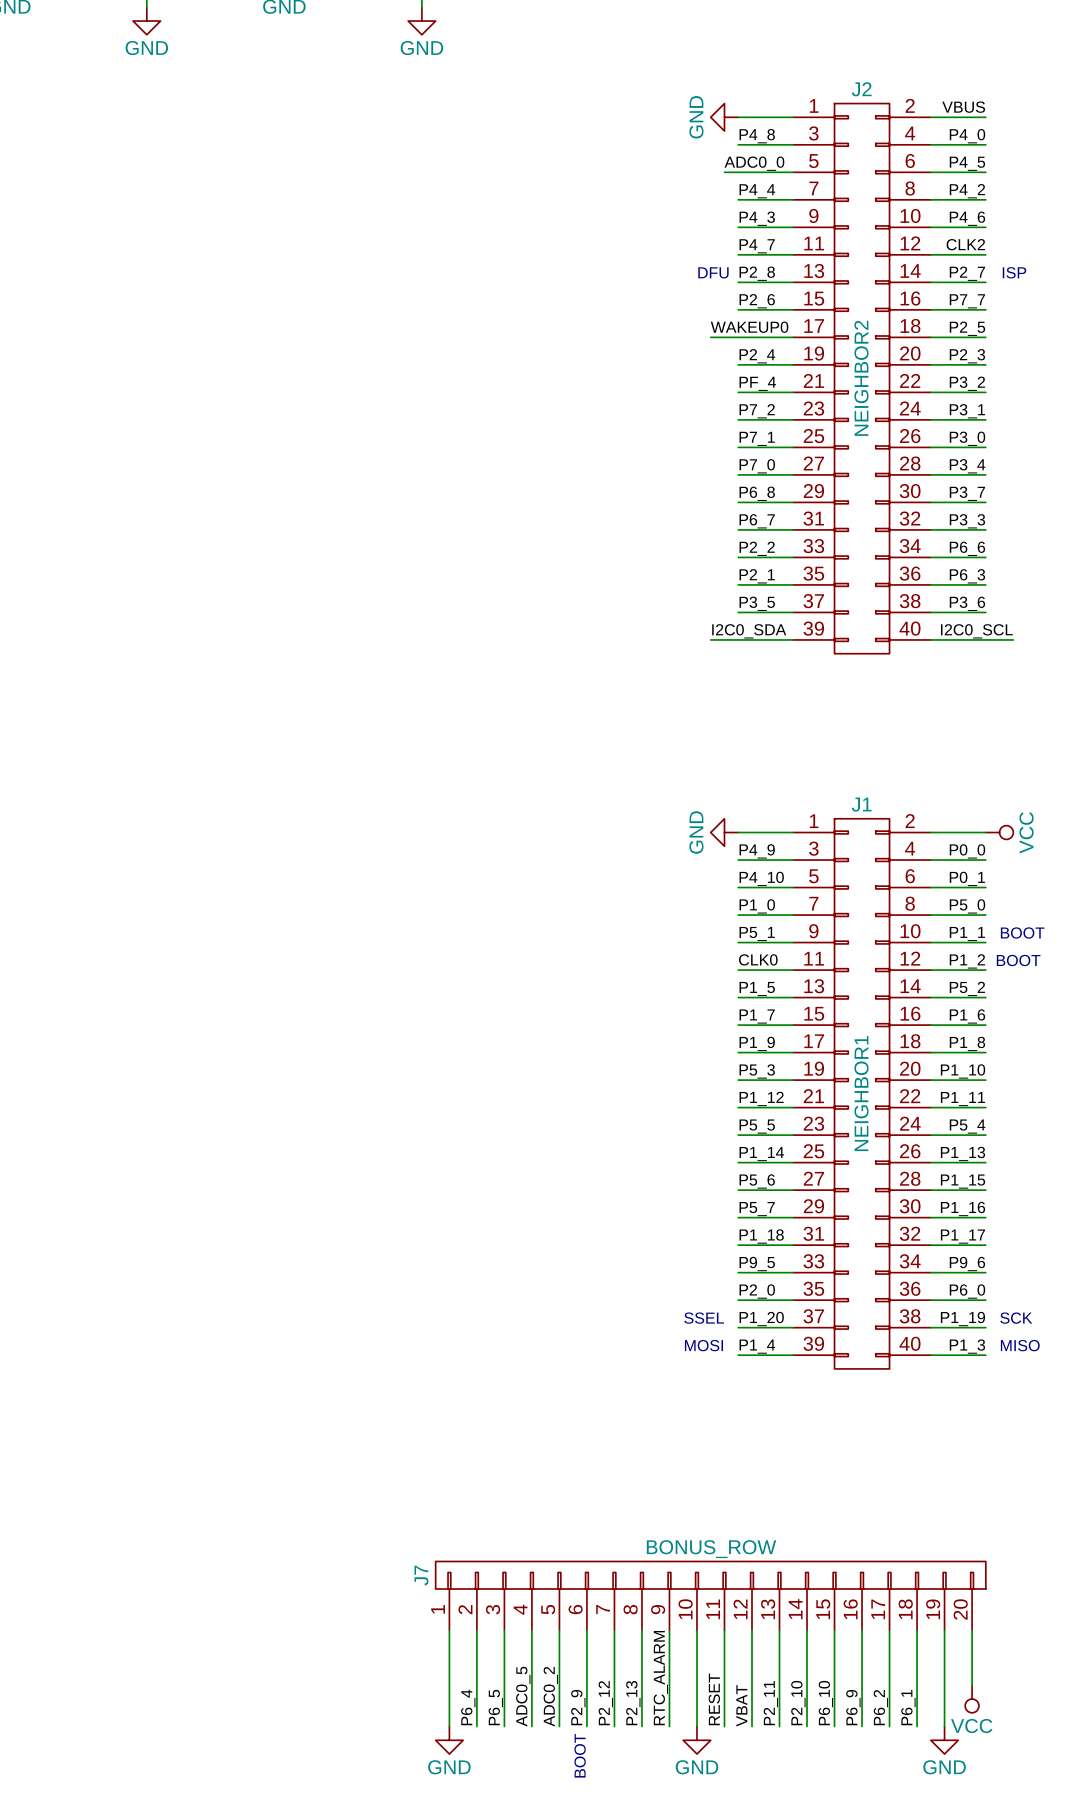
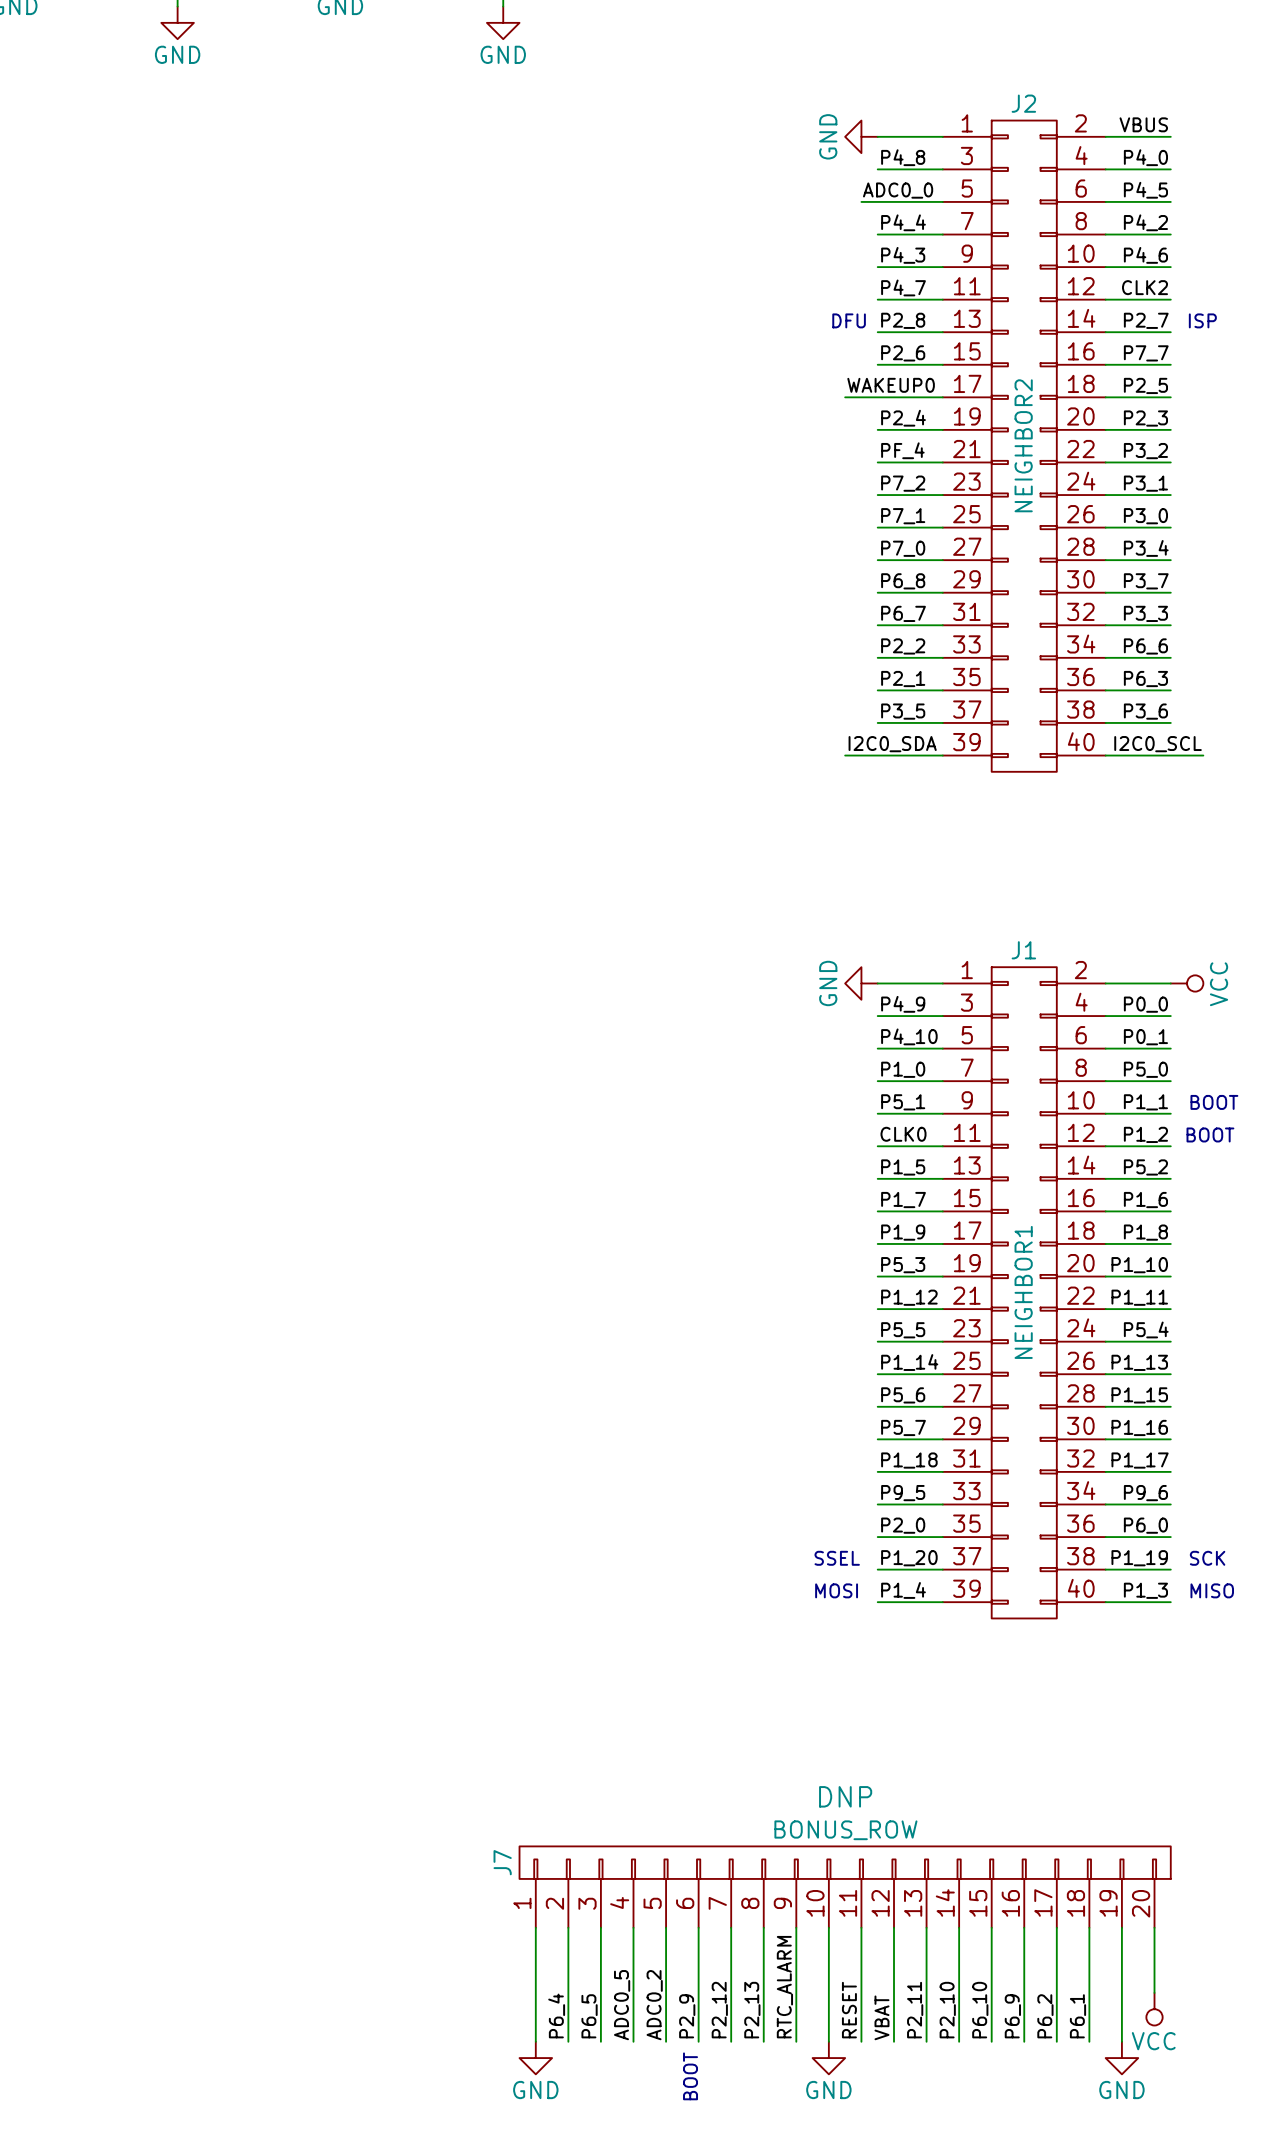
J7 text: none -> DNP (845, 1796)

